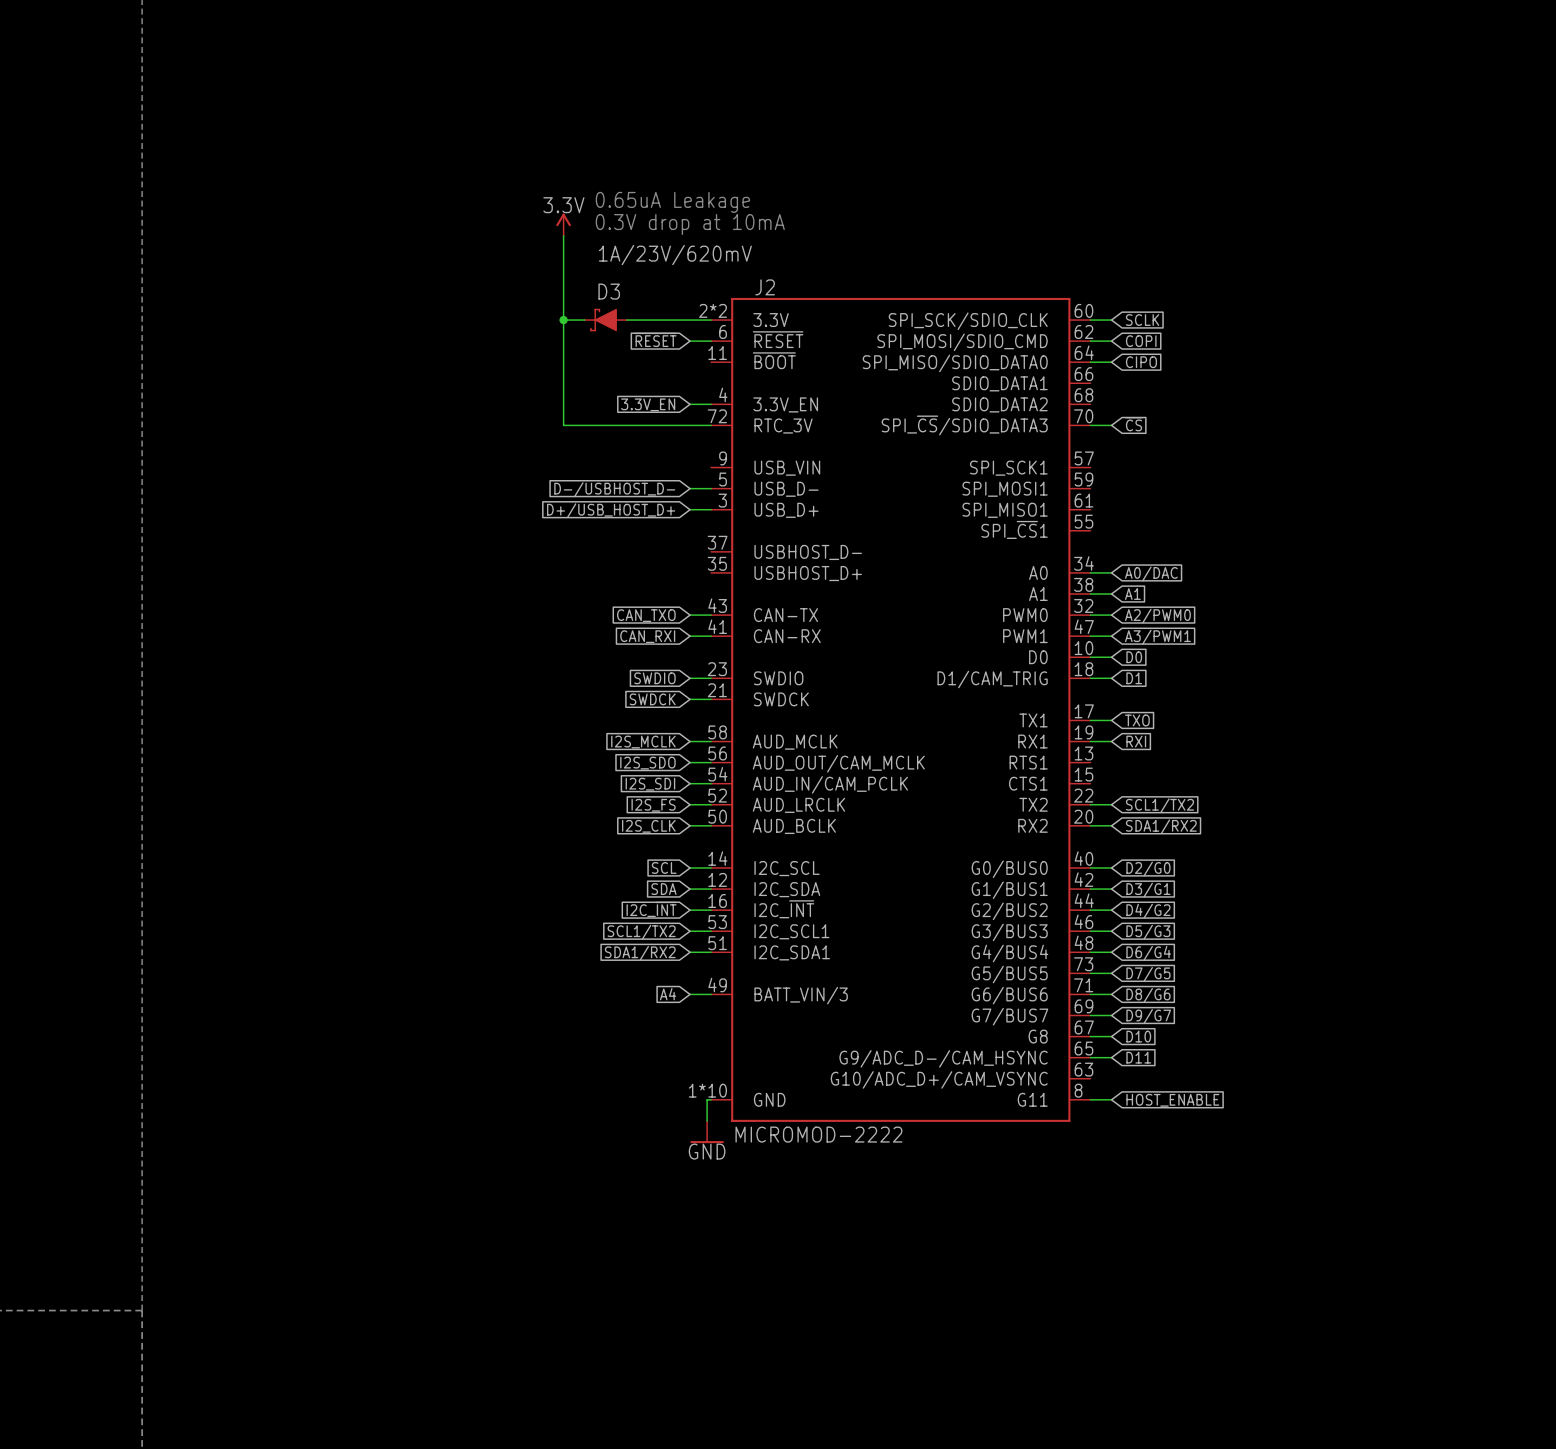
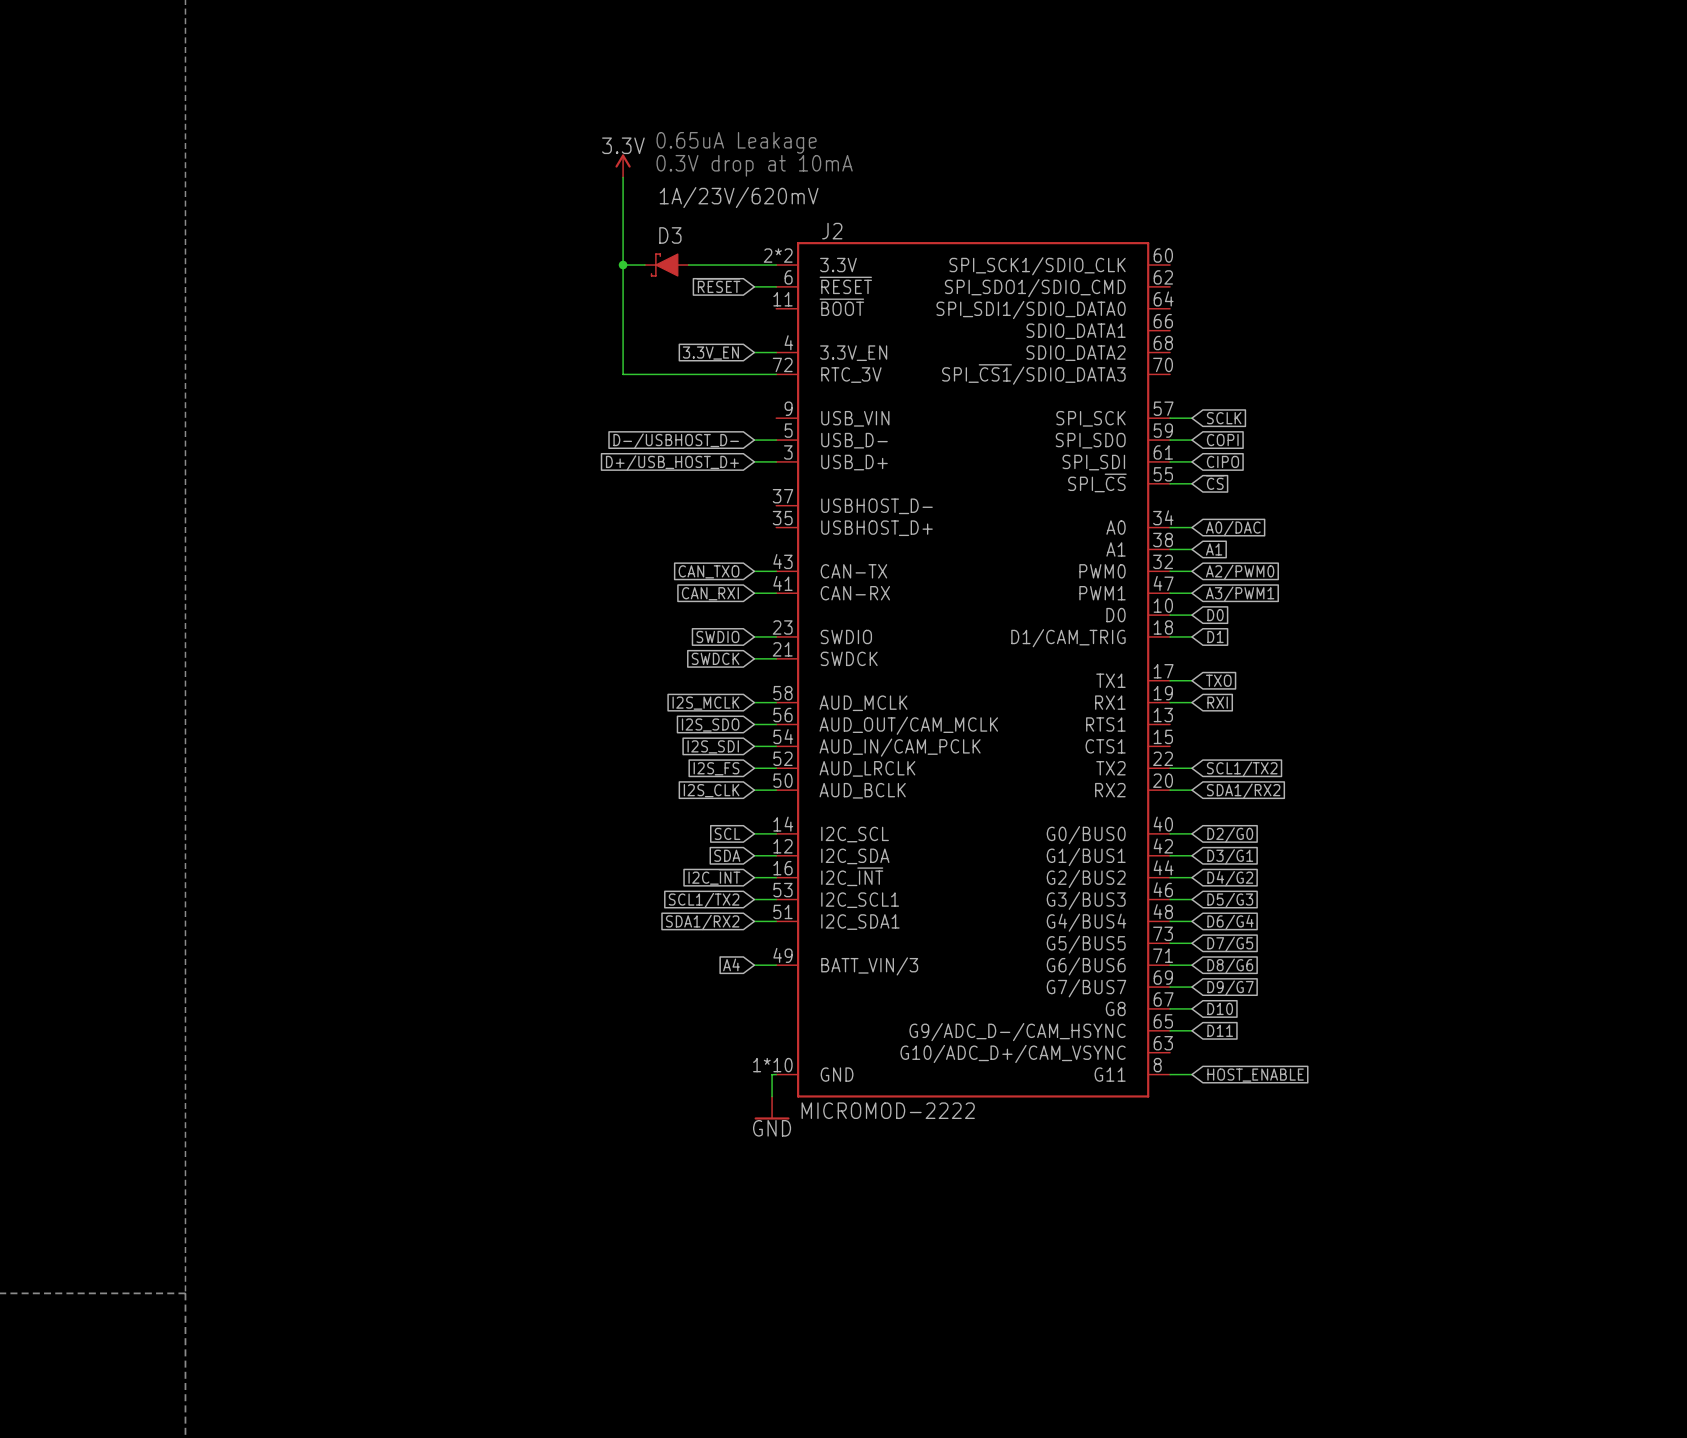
wire: (1090, 320) (1111, 320) -> (1170, 418) (1191, 418)
global label position: SCLK (1142, 320) -> SCLK (1224, 418)
J2 pin name: SPI_SCK/SDIO_CLK (968, 321) -> SPI_SCK1/SDIO_CLK (1037, 266)
wire: (1090, 341) (1111, 341) -> (1170, 440) (1191, 440)
global label position: COPI (1141, 341) -> COPI (1222, 440)
J2 pin name: SPI_MOSI/SDIO_CMD (962, 342) -> SPI_SDO1/SDIO_CMD (1035, 288)
wire: (1090, 362) (1111, 362) -> (1170, 461) (1191, 461)
global label position: CIPO (1141, 362) -> CIPO (1223, 461)
J2 pin name: SPI_MISO/SDIO_DATA0 (955, 363) -> SPI_SDI1/SDIO_DATA0 (1031, 310)
global label position: ~{CS} (1134, 424) -> ~{CS} (1215, 482)
J2 pin name: SPI_~{CS}/SDIO_DATA3 (964, 425) -> SPI_~{CS1}/SDIO_DATA3 (1033, 374)
wire: (1090, 425) (1111, 425) -> (1170, 483) (1191, 483)
J2 pin name: SPI_SCK1 (1008, 468) -> SPI_SCK (1090, 418)
J2 pin name: SPI_MOSI1 (1005, 489) -> SPI_SDO (1090, 440)
J2 pin name: SPI_MISO1 (1005, 510) -> SPI_SDI (1093, 462)
J2 pin name: SPI_~{CS}1 (1014, 529) -> SPI_~{CS} (1097, 482)

